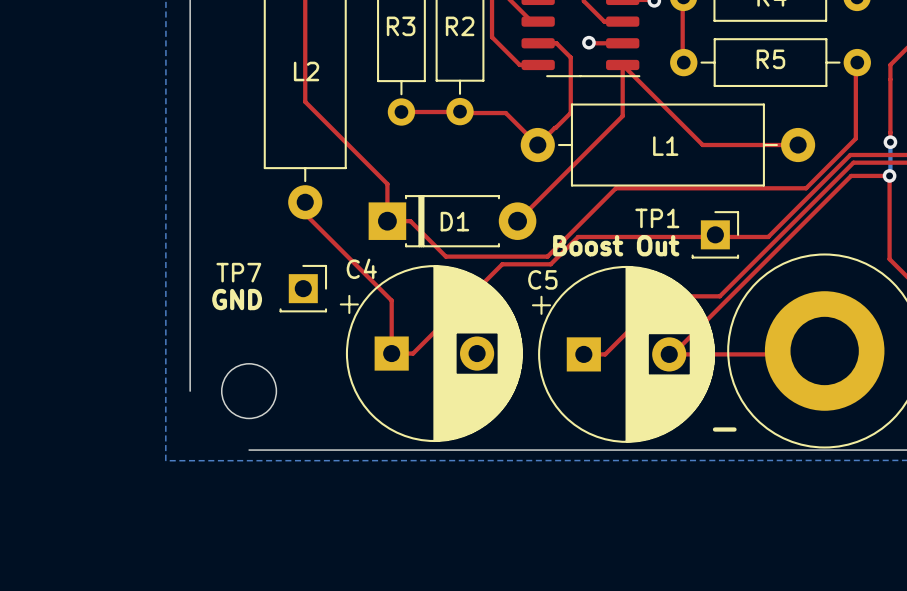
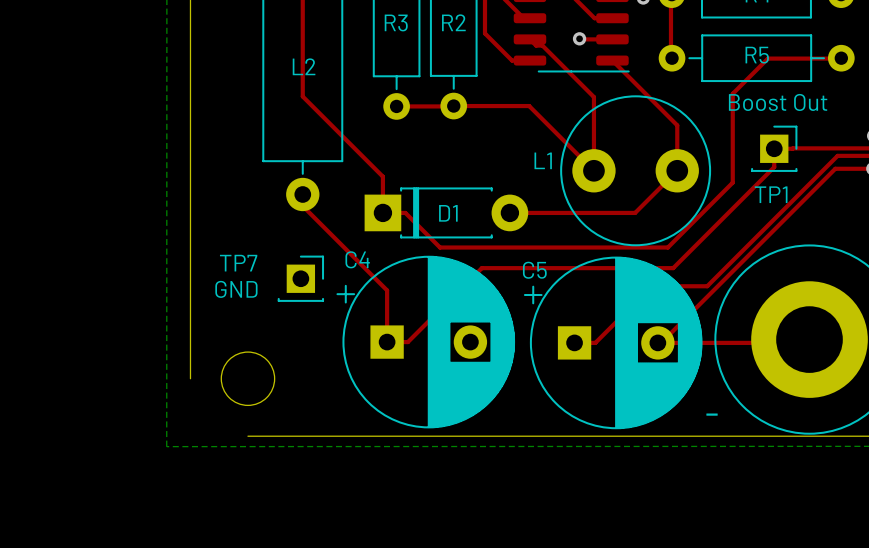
top track: (538, 43) (556, 43) (570, 57) (570, 112) (537, 145) (505, 113) (465, 112) -> (529, 39) (536, 45) (542, 45) (593, 97) (593, 170) (529, 106) (453, 106)
top track: (855, 62) (855, 138) (806, 188) (615, 188) (547, 256) -> (839, 58) (767, 58) (732, 93) (732, 182) (667, 247) (539, 247)
top track: (622, 64) (622, 116) (517, 221) -> (677, 125) (677, 170) (635, 212) (509, 212)
L1 footprint: [520, 103, 816, 187] -> [560, 95, 712, 247]
top track: (689, 131) (702, 145) (798, 145) -> none
L1 name position: L1 (665, 146) -> L1 (543, 160)
top track: (850, 154) (768, 236) (578, 236) (550, 264) (502, 264) (488, 277) -> (834, 148) (774, 148) (774, 167) (673, 268) (481, 268)
TP1 name position: TP1 (657, 218) -> TP1 (771, 194)
TP1 position: (715, 234) -> (774, 148)
text position: Boost Out (616, 245) -> Boost Out (778, 102)

